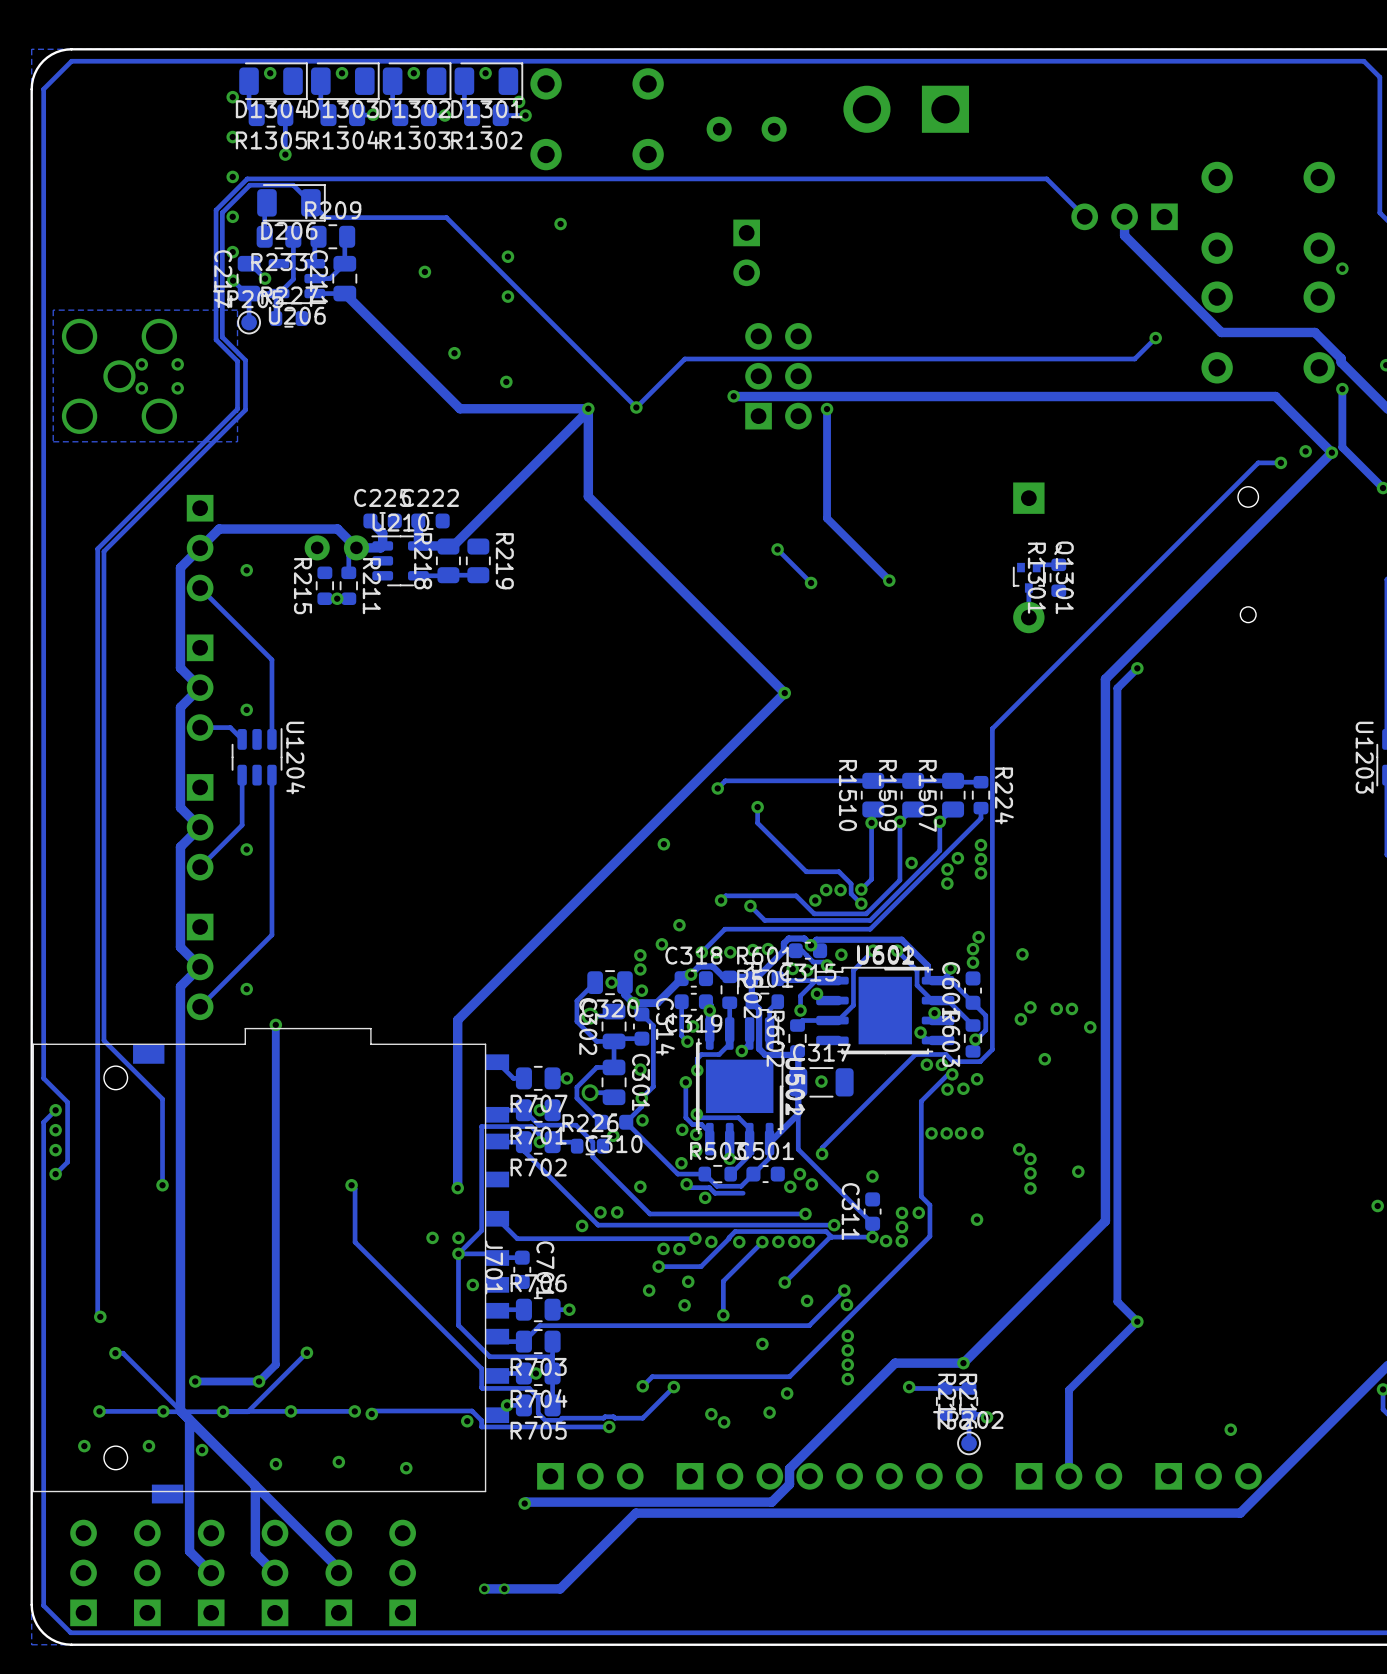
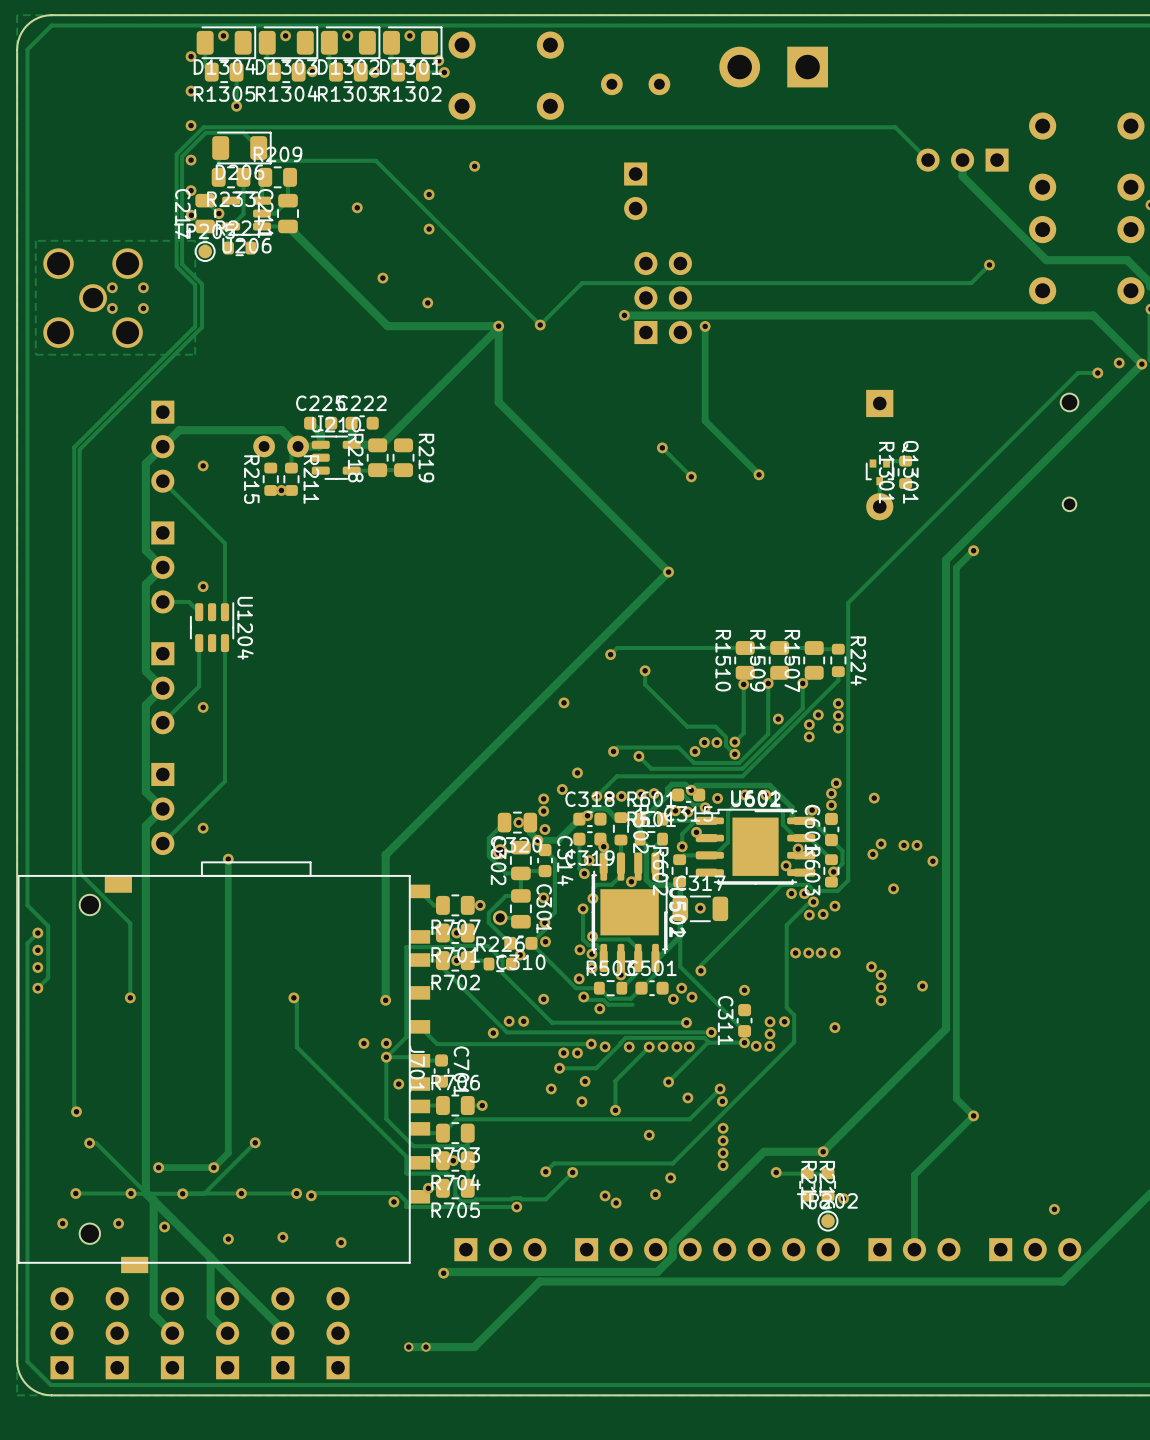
J701 footprint: [32, 1028, 510, 1504] -> [18, 861, 431, 1274]

